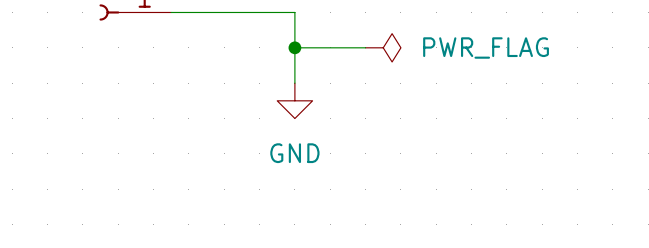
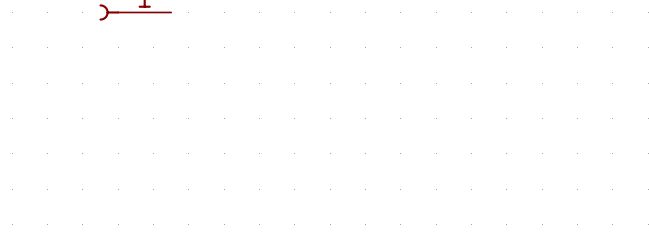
wire: (171, 12) (294, 12) (294, 83) -> none
wire: (294, 47) (365, 47) -> none
junction: (294, 47) -> none
power symbol: PWR_FLAG (383, 47) -> none
power symbol: GND (294, 100) -> none

